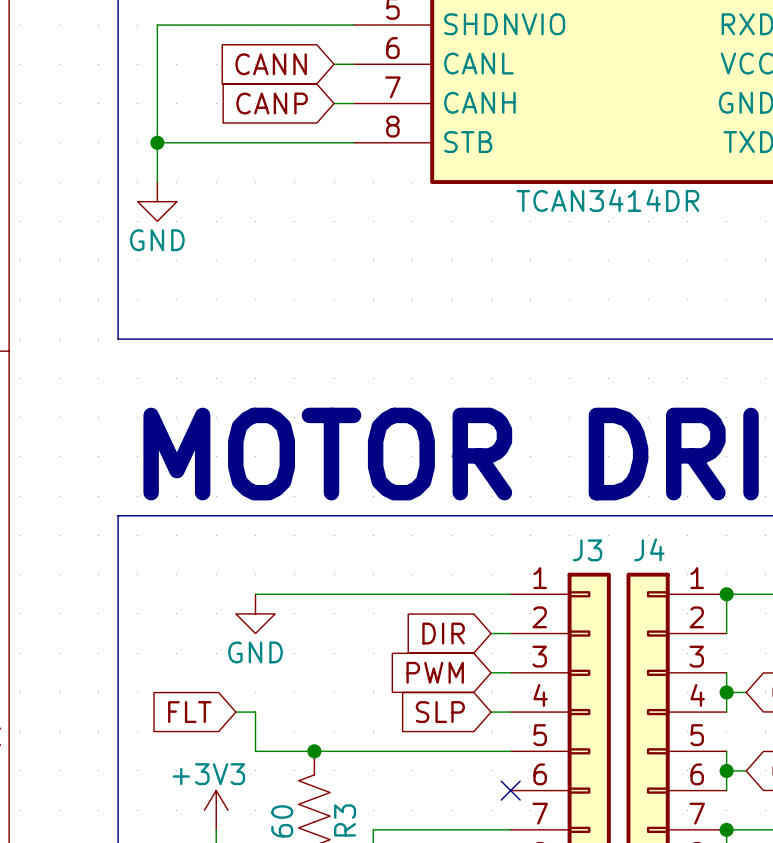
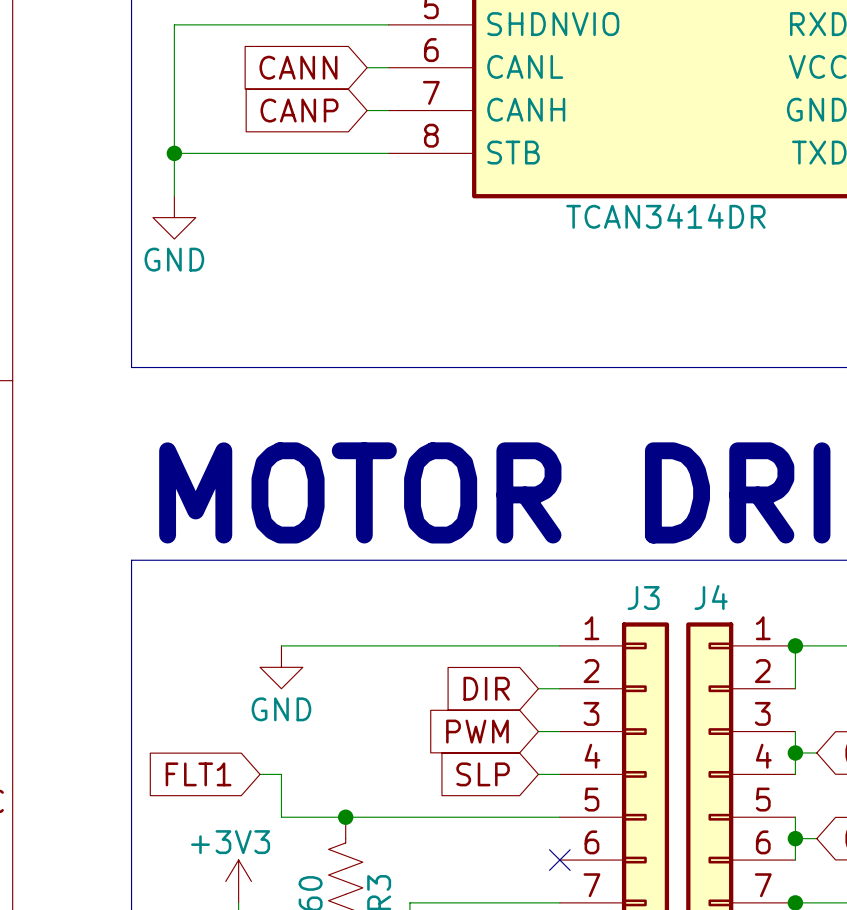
global label: FLT (189, 712) -> FLT1 (198, 774)

